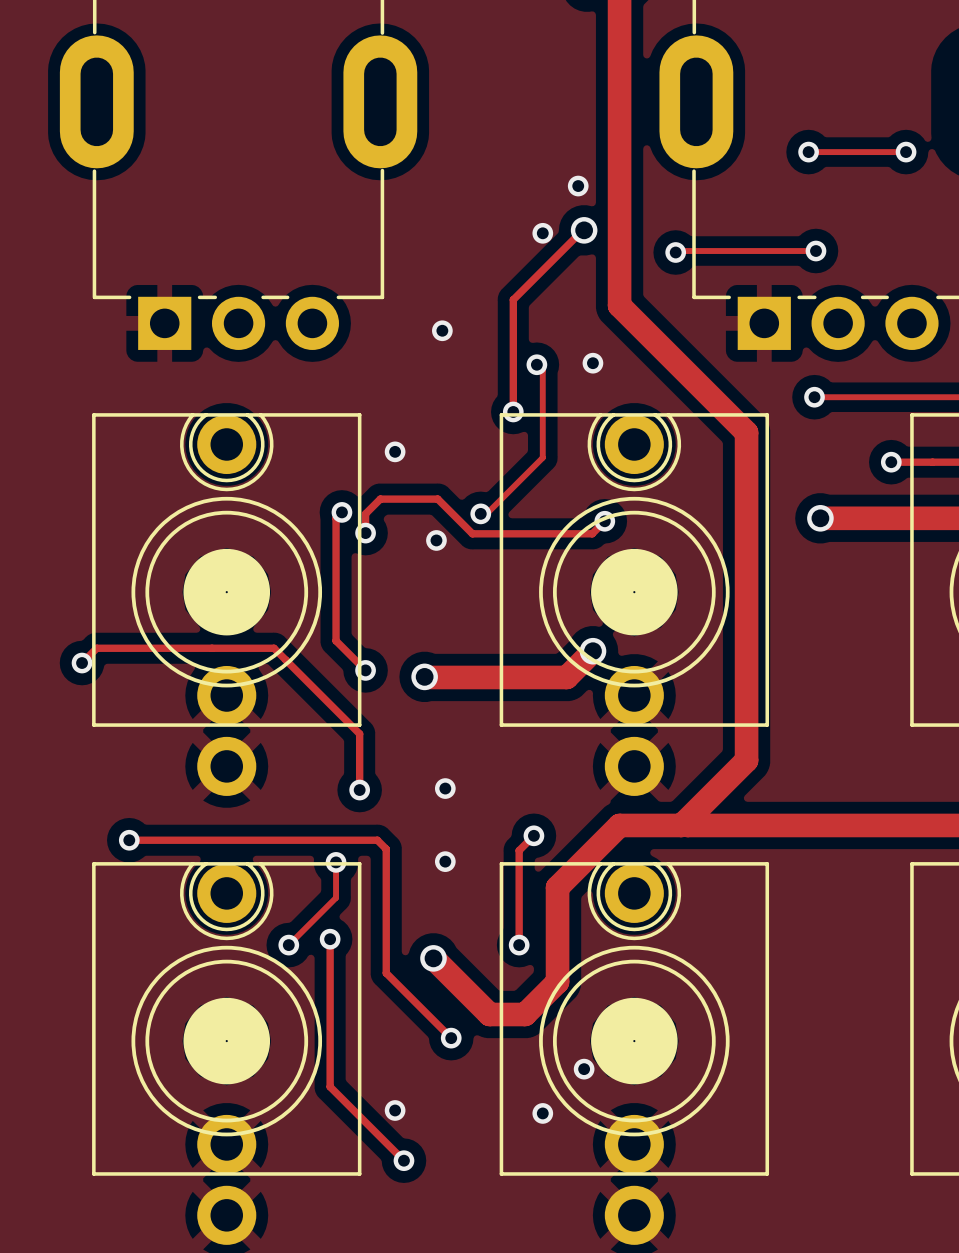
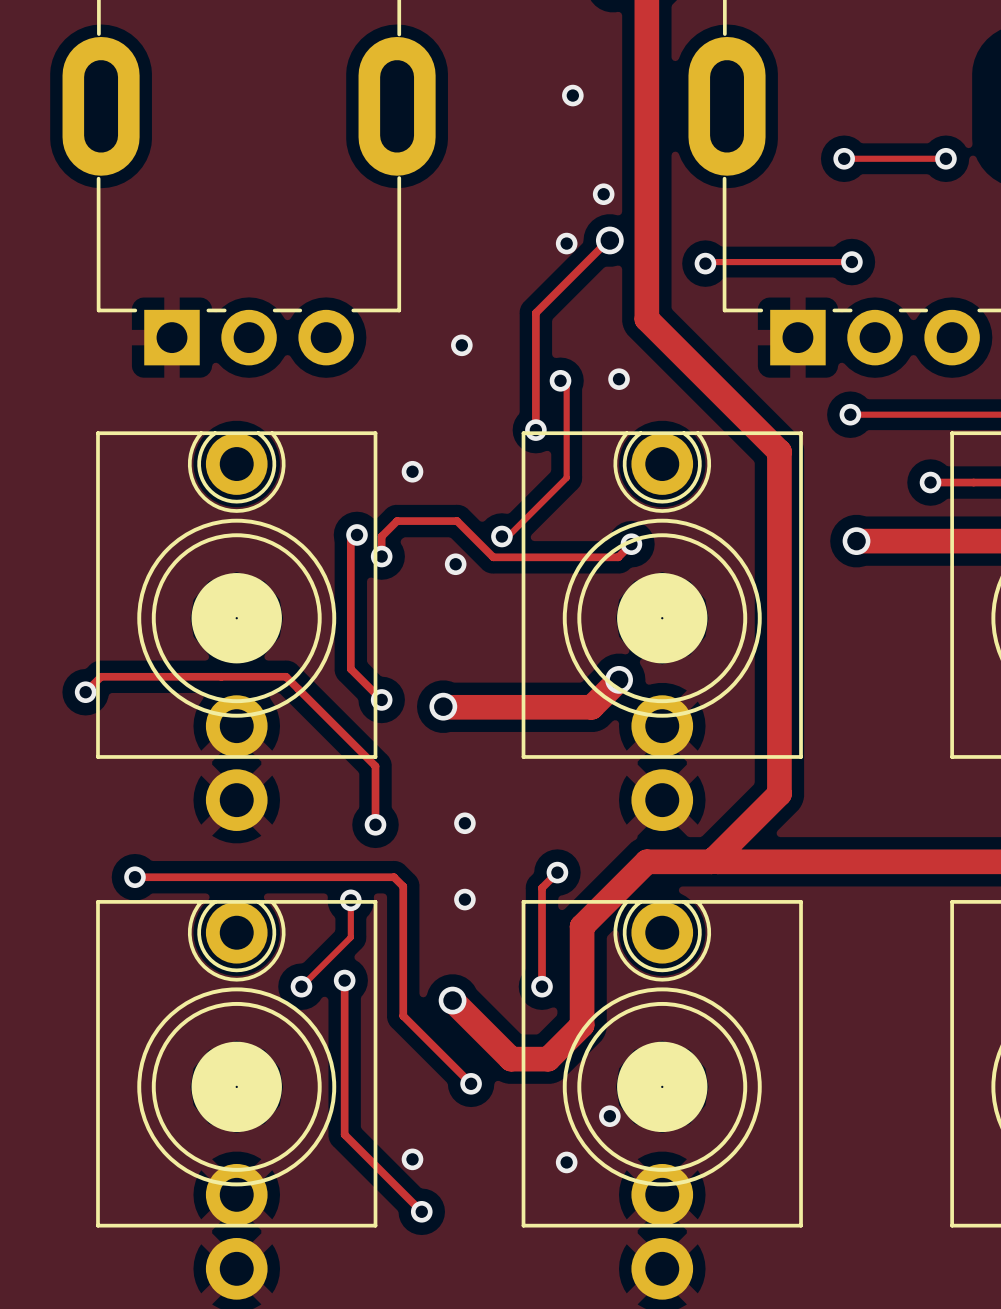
via: none -> (572, 95)

